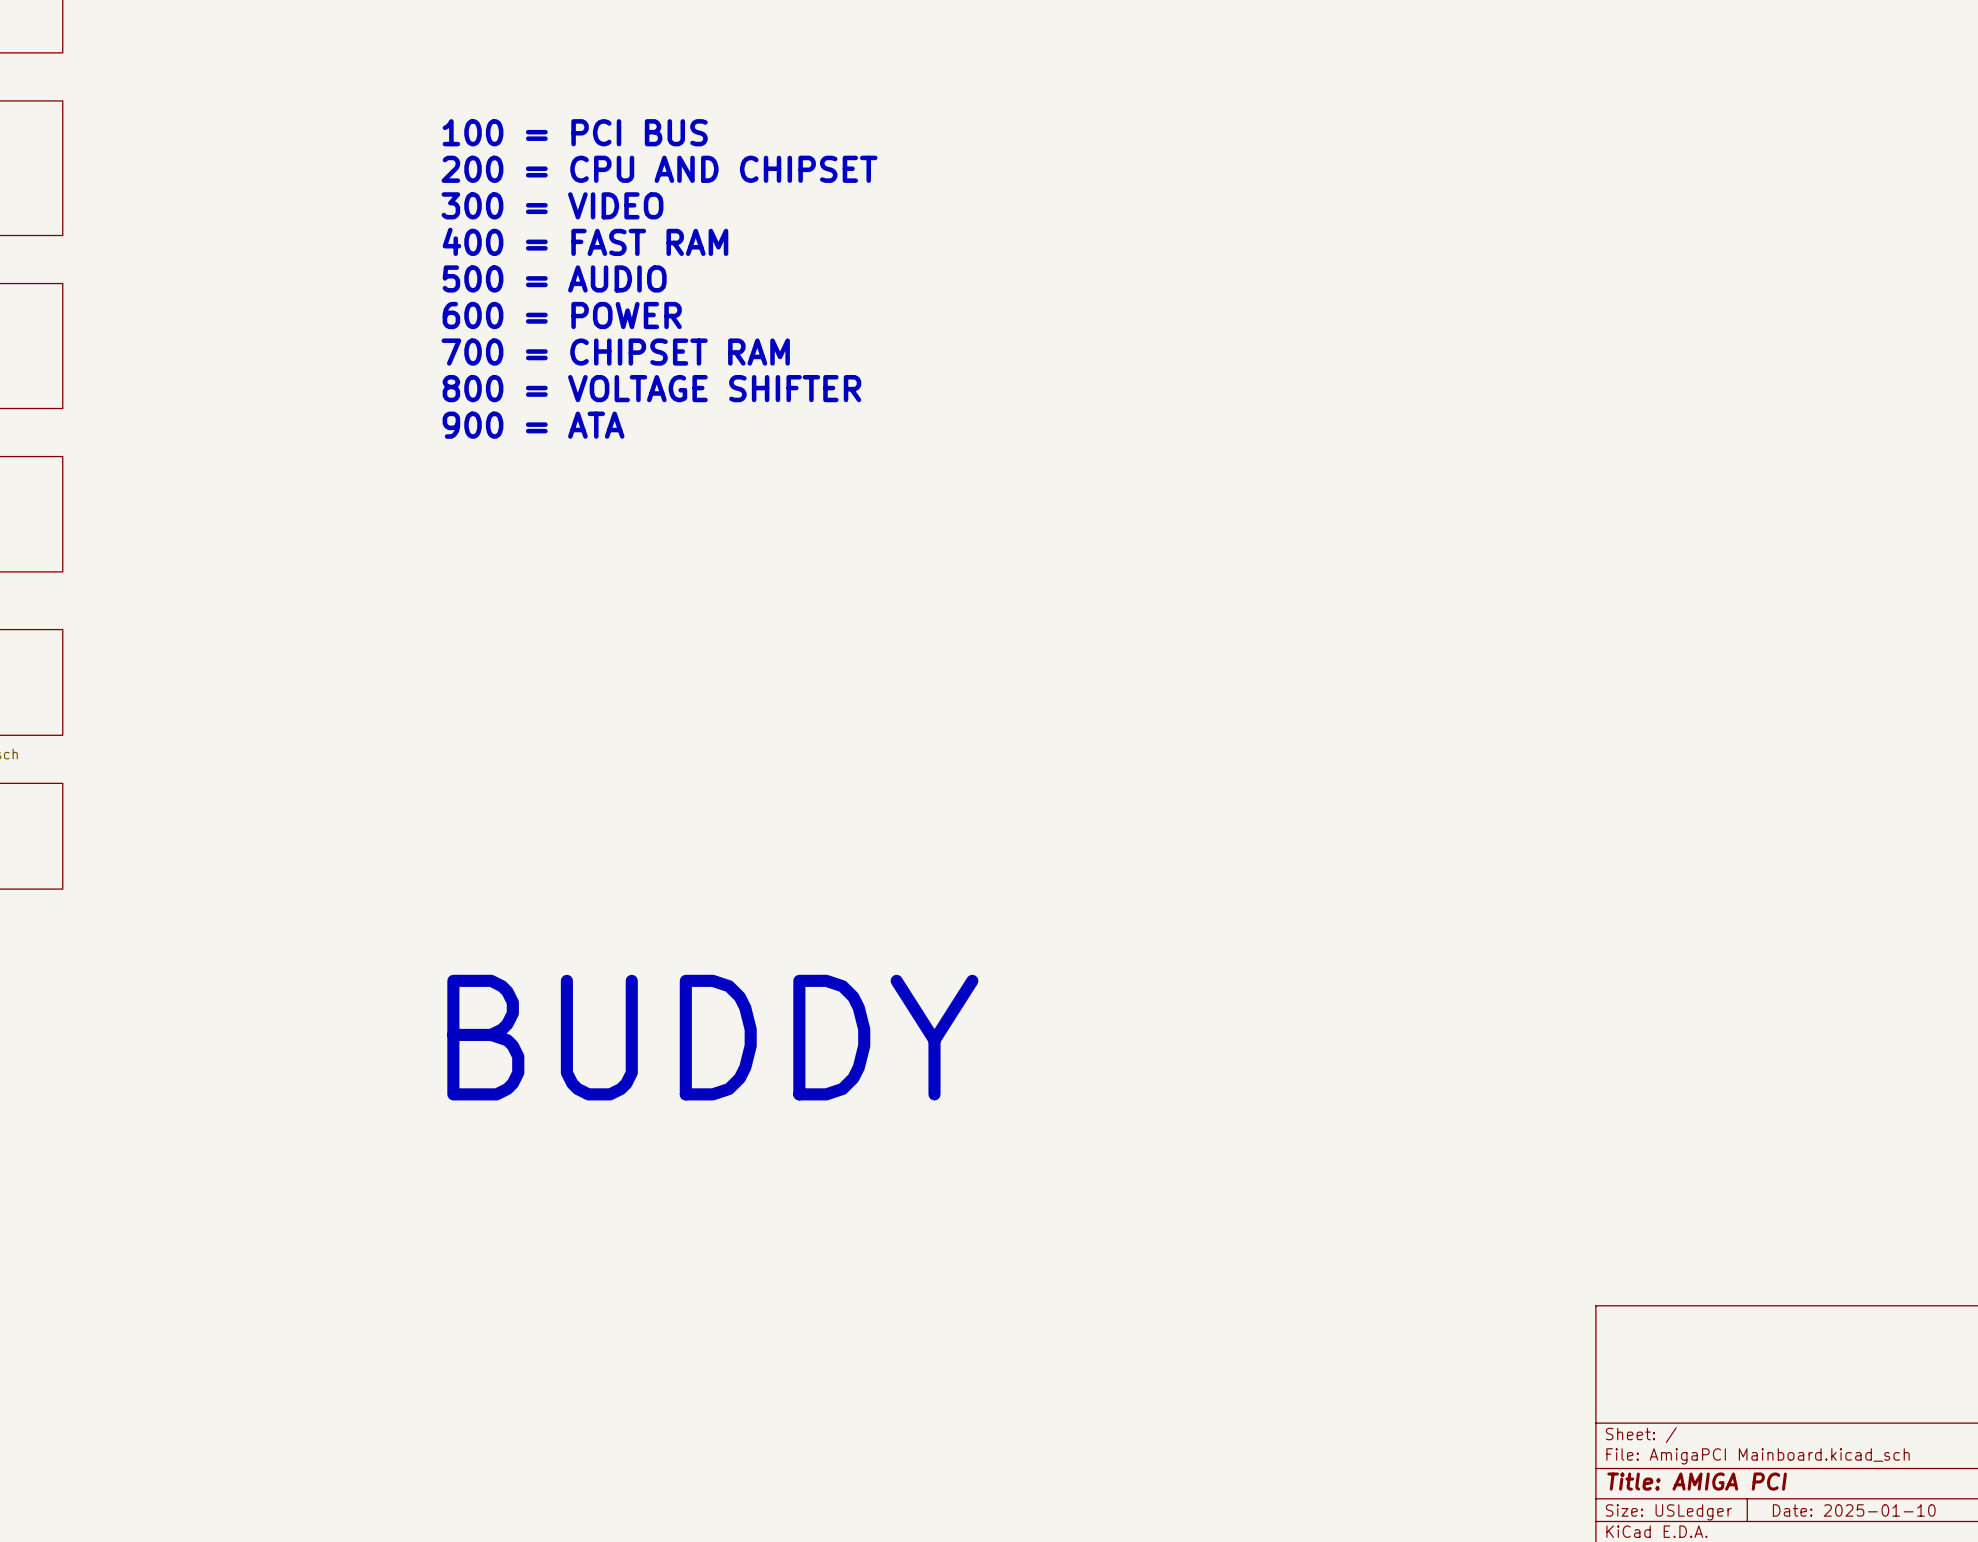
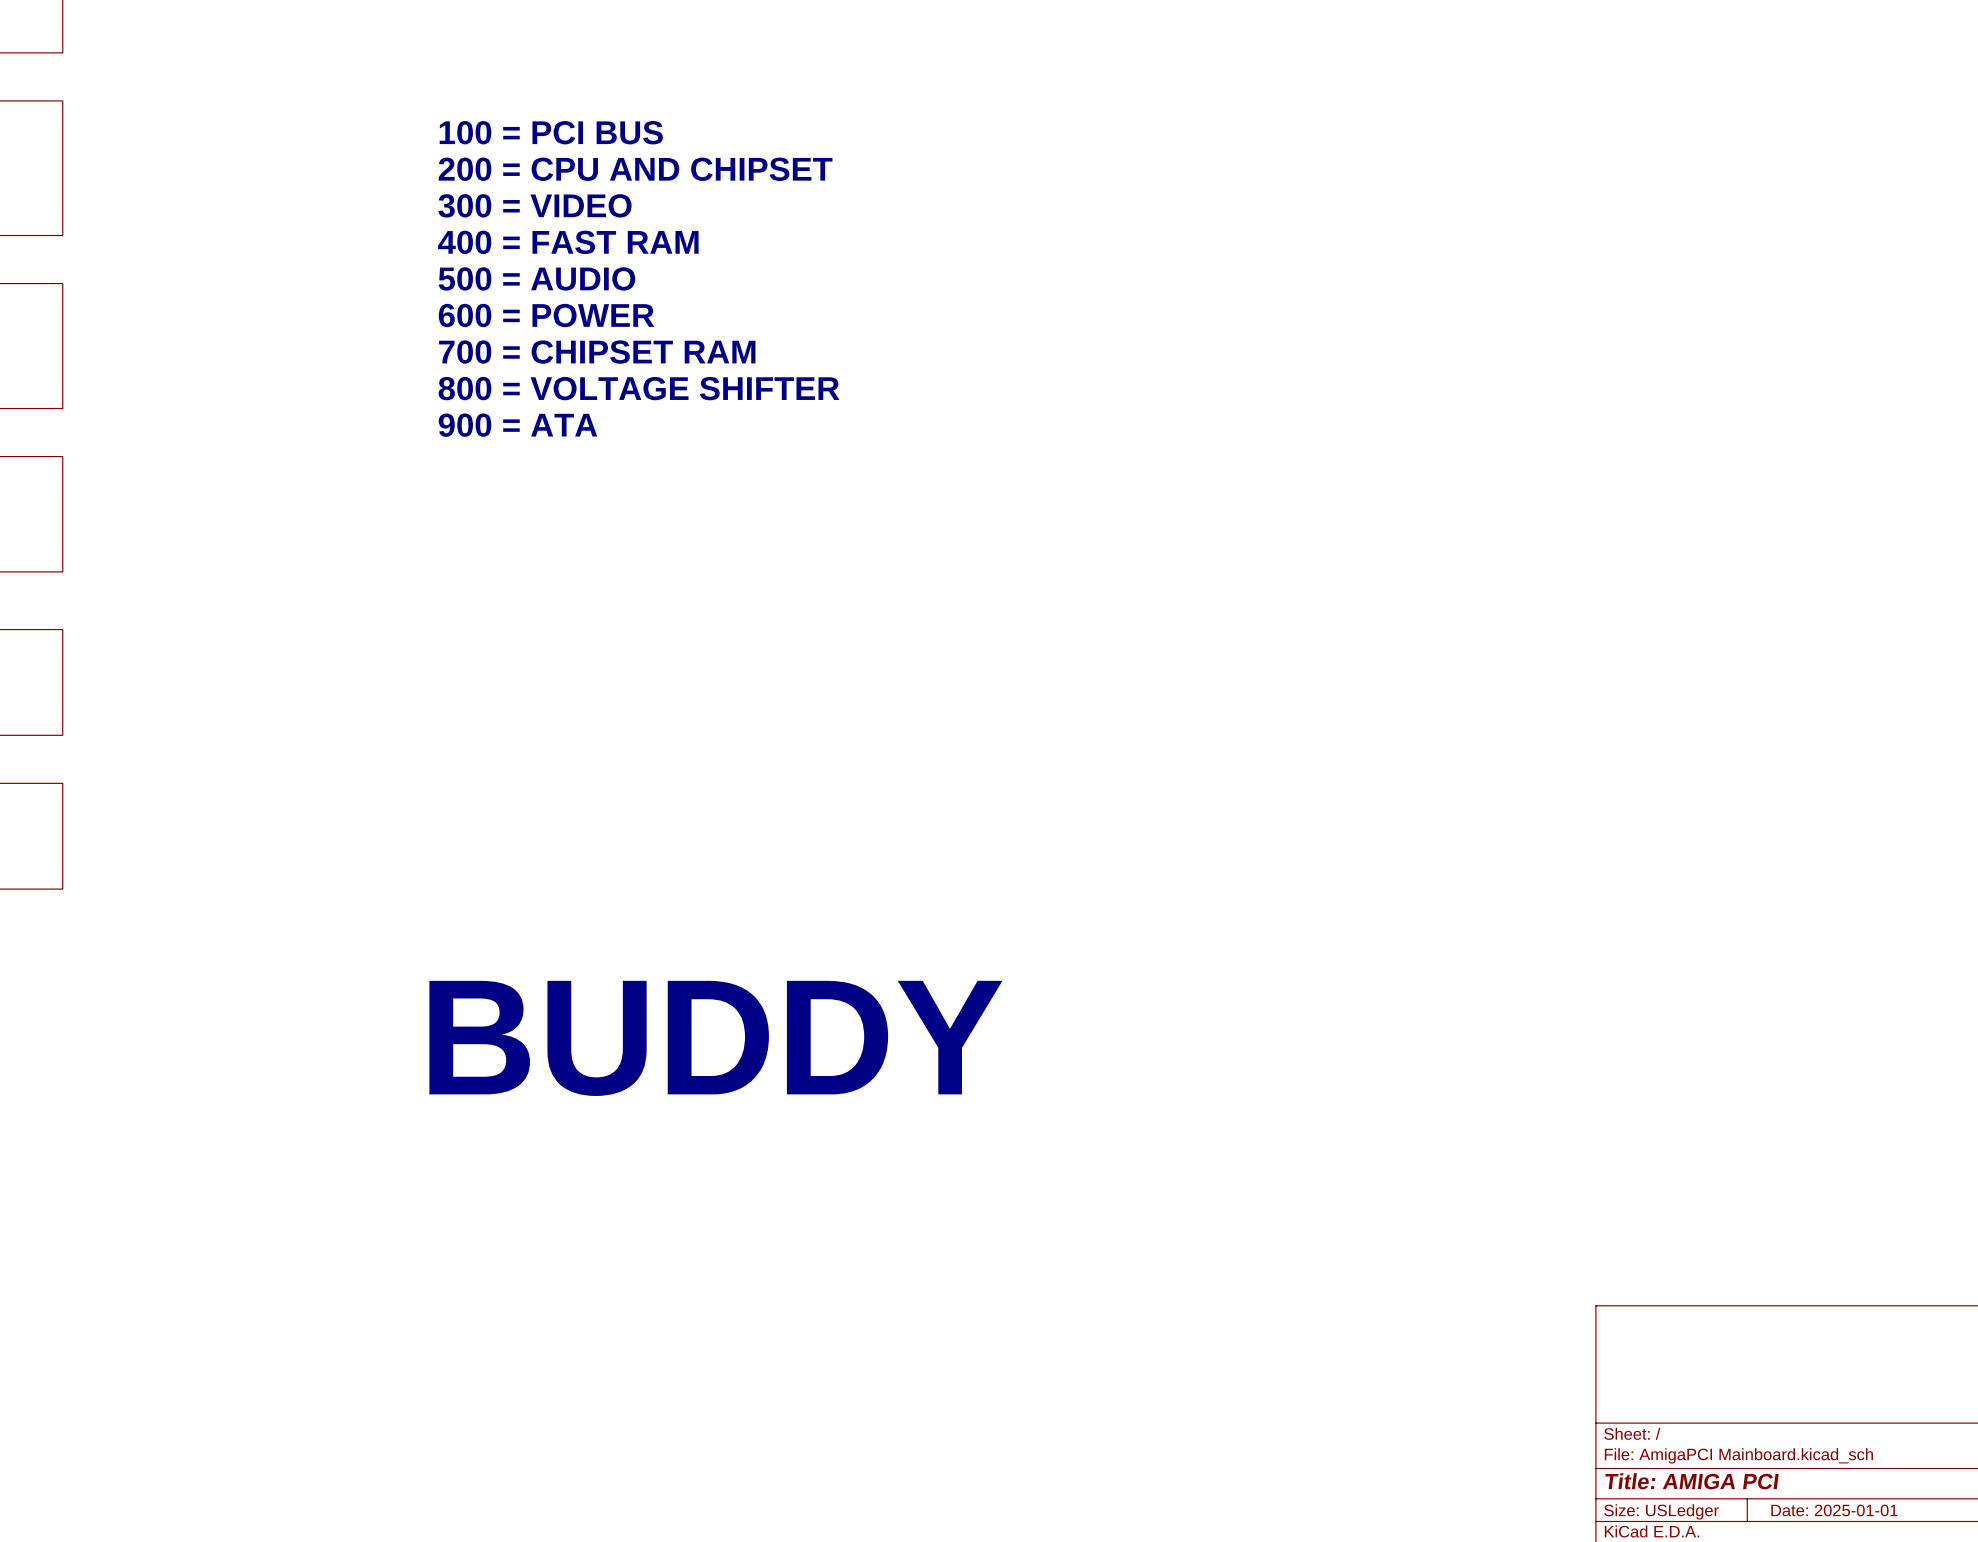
title block: Date: 2025-01-10 (1854, 1510) -> Date: 2025-01-01 (1834, 1510)

